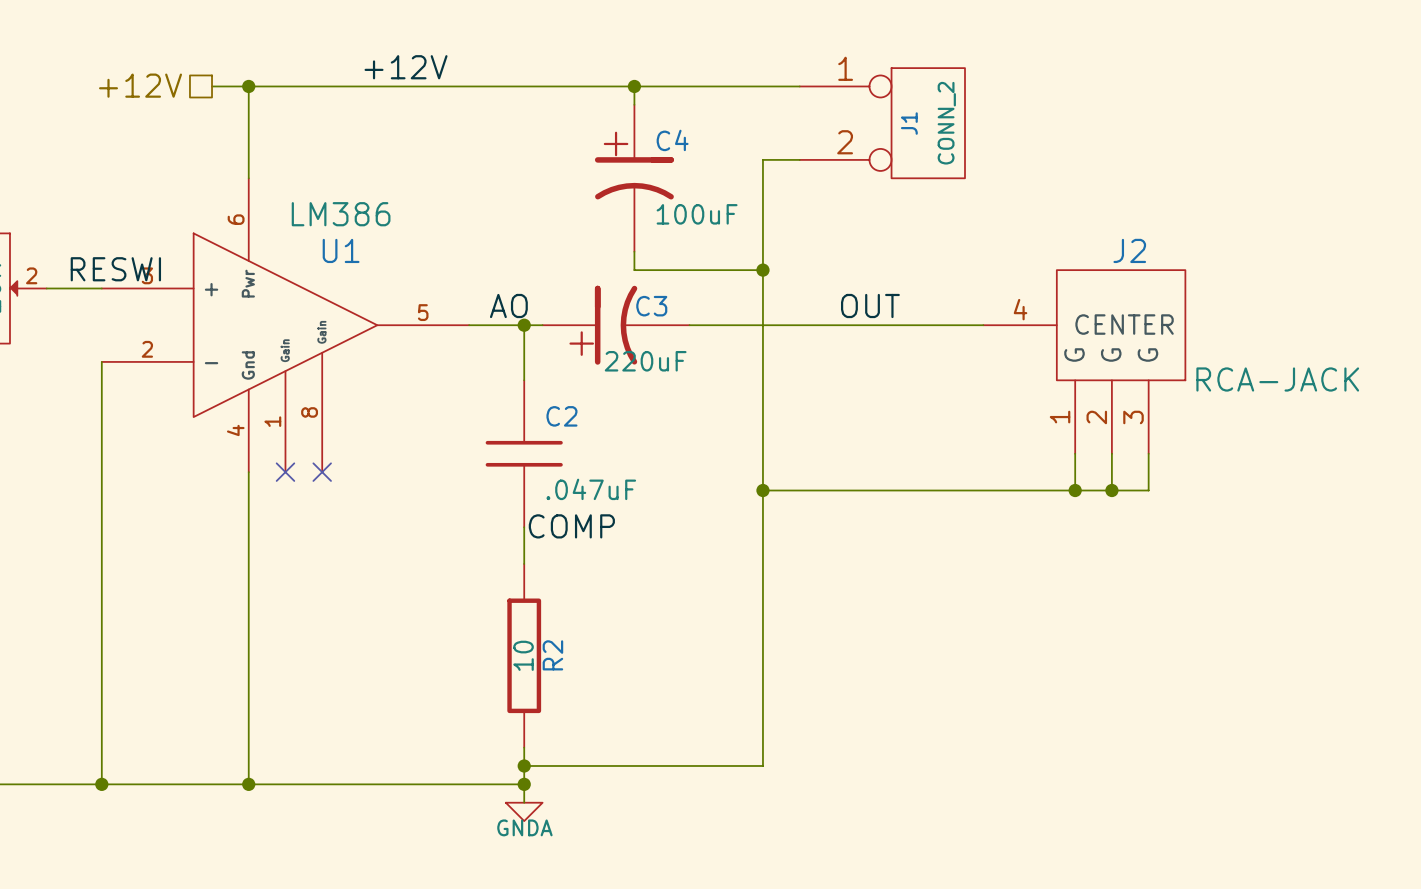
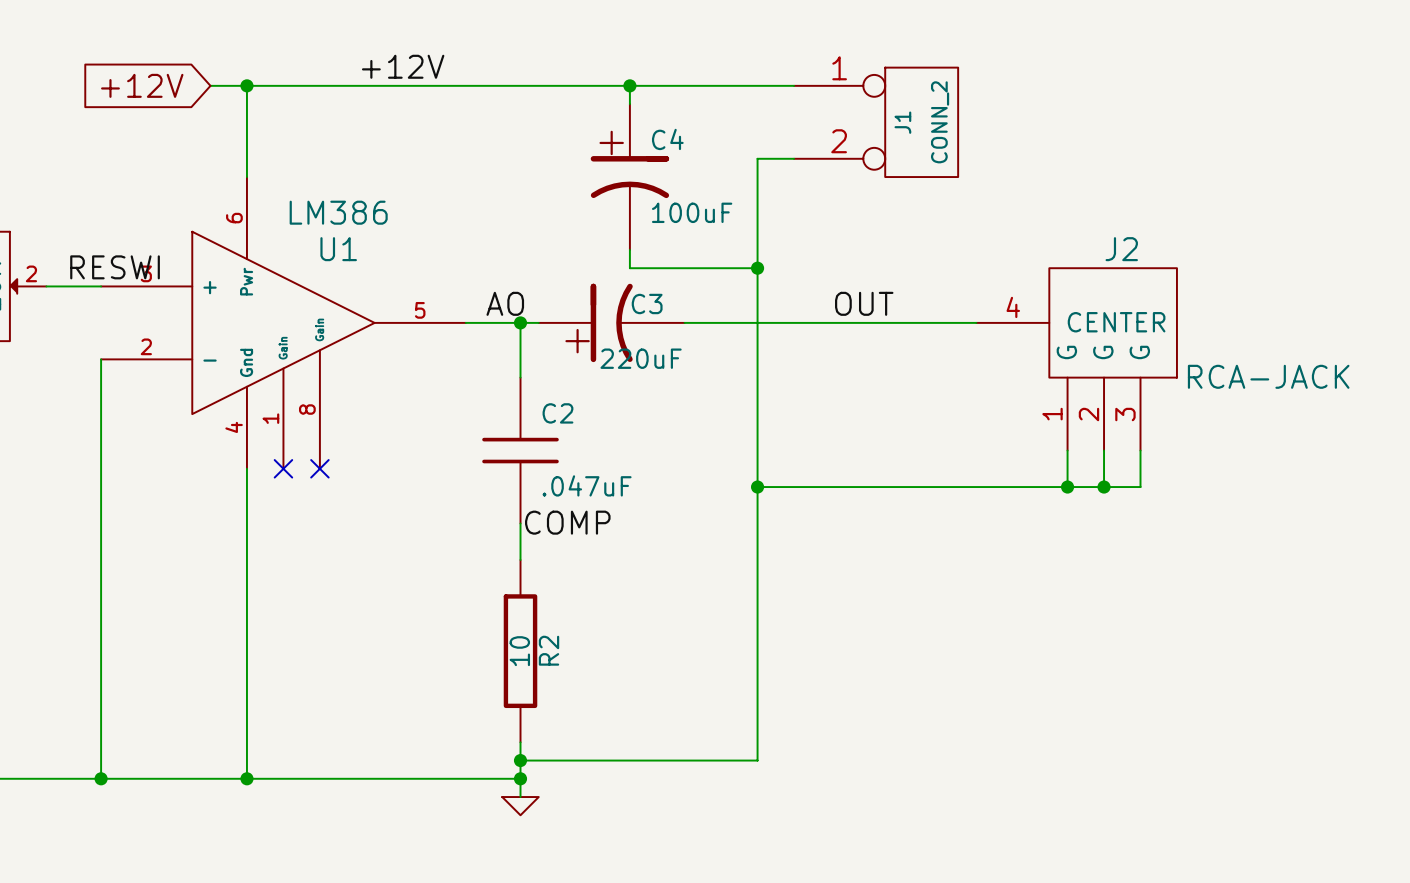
hierarchical label: +12V (140, 85) -> none
global label: none -> +12V (142, 85)
power symbol text: GNDA (524, 827) -> none

